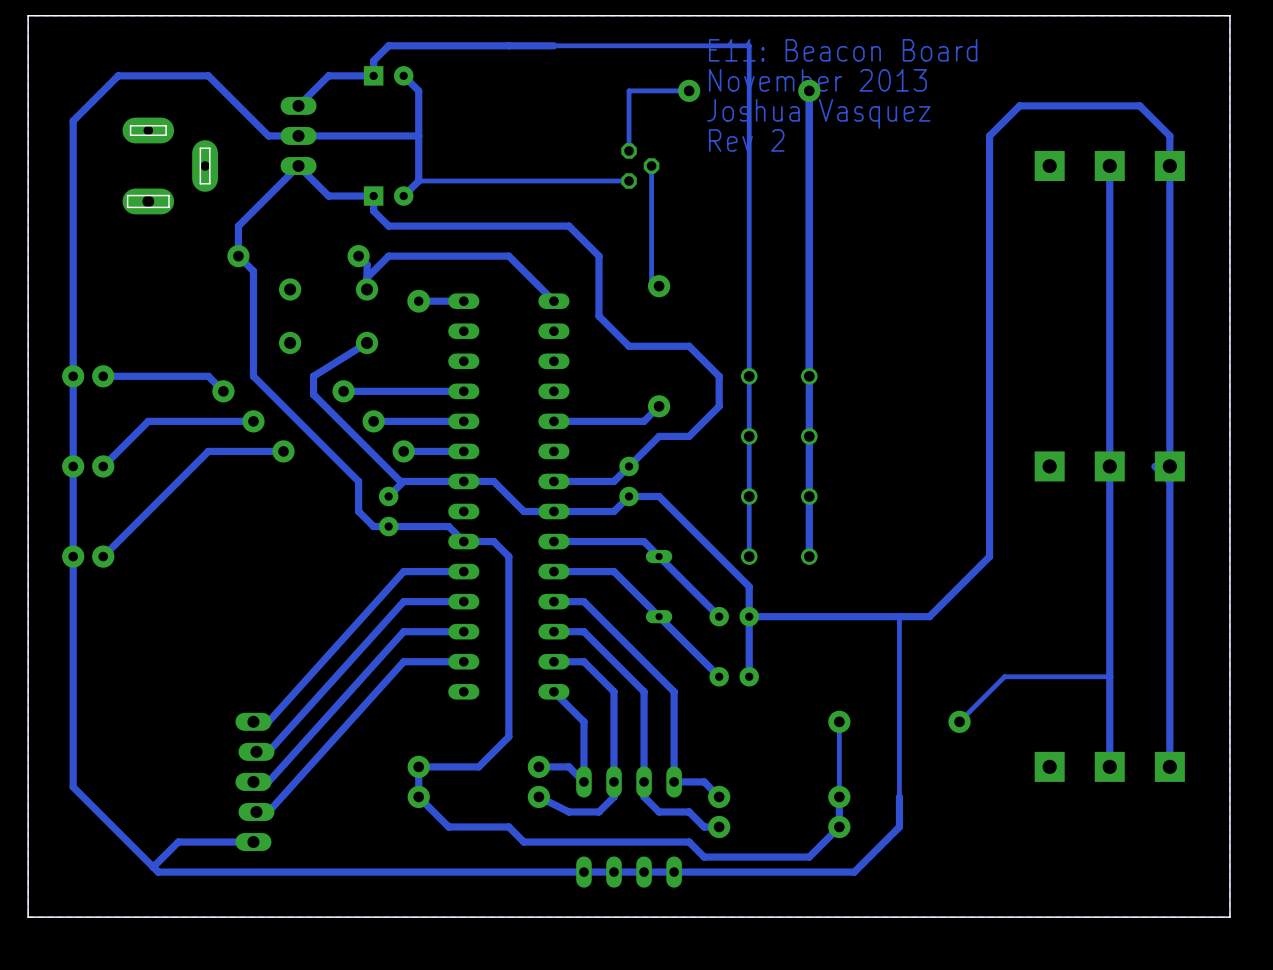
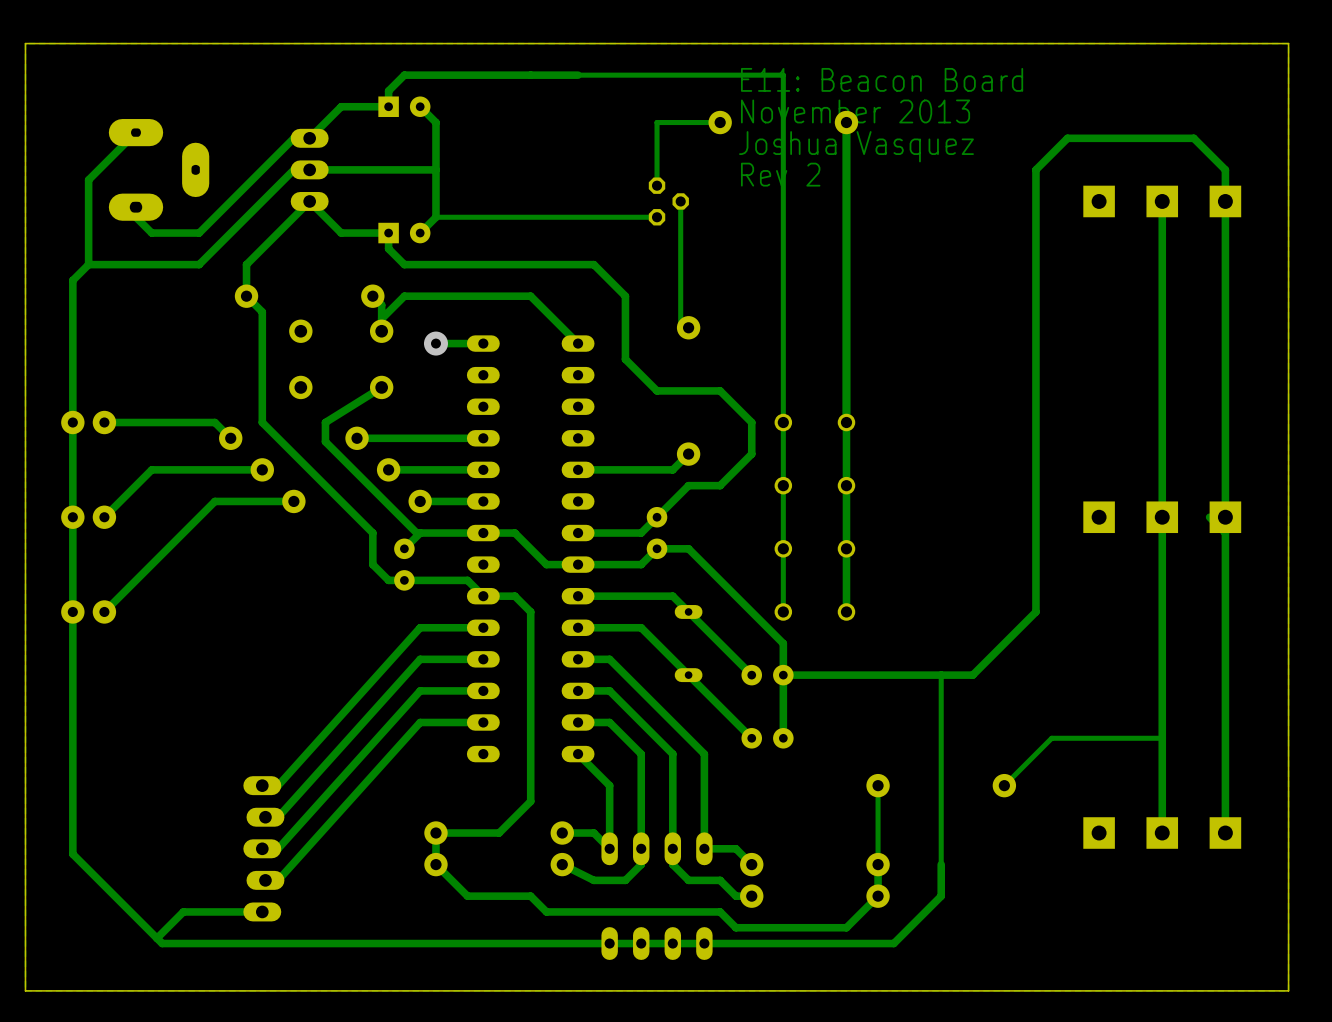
track: none -> (135, 132) (88, 179) (88, 264)
track: none -> (309, 138) (293, 138) (199, 233) (151, 233) (135, 217) (135, 207)
track: (283, 135) (268, 135) (208, 75) (118, 75) (73, 120) (73, 241) -> (293, 169) (199, 264) (88, 264)
part position: (170, 165) -> (159, 169)
track: none -> (88, 264) (72, 280)

